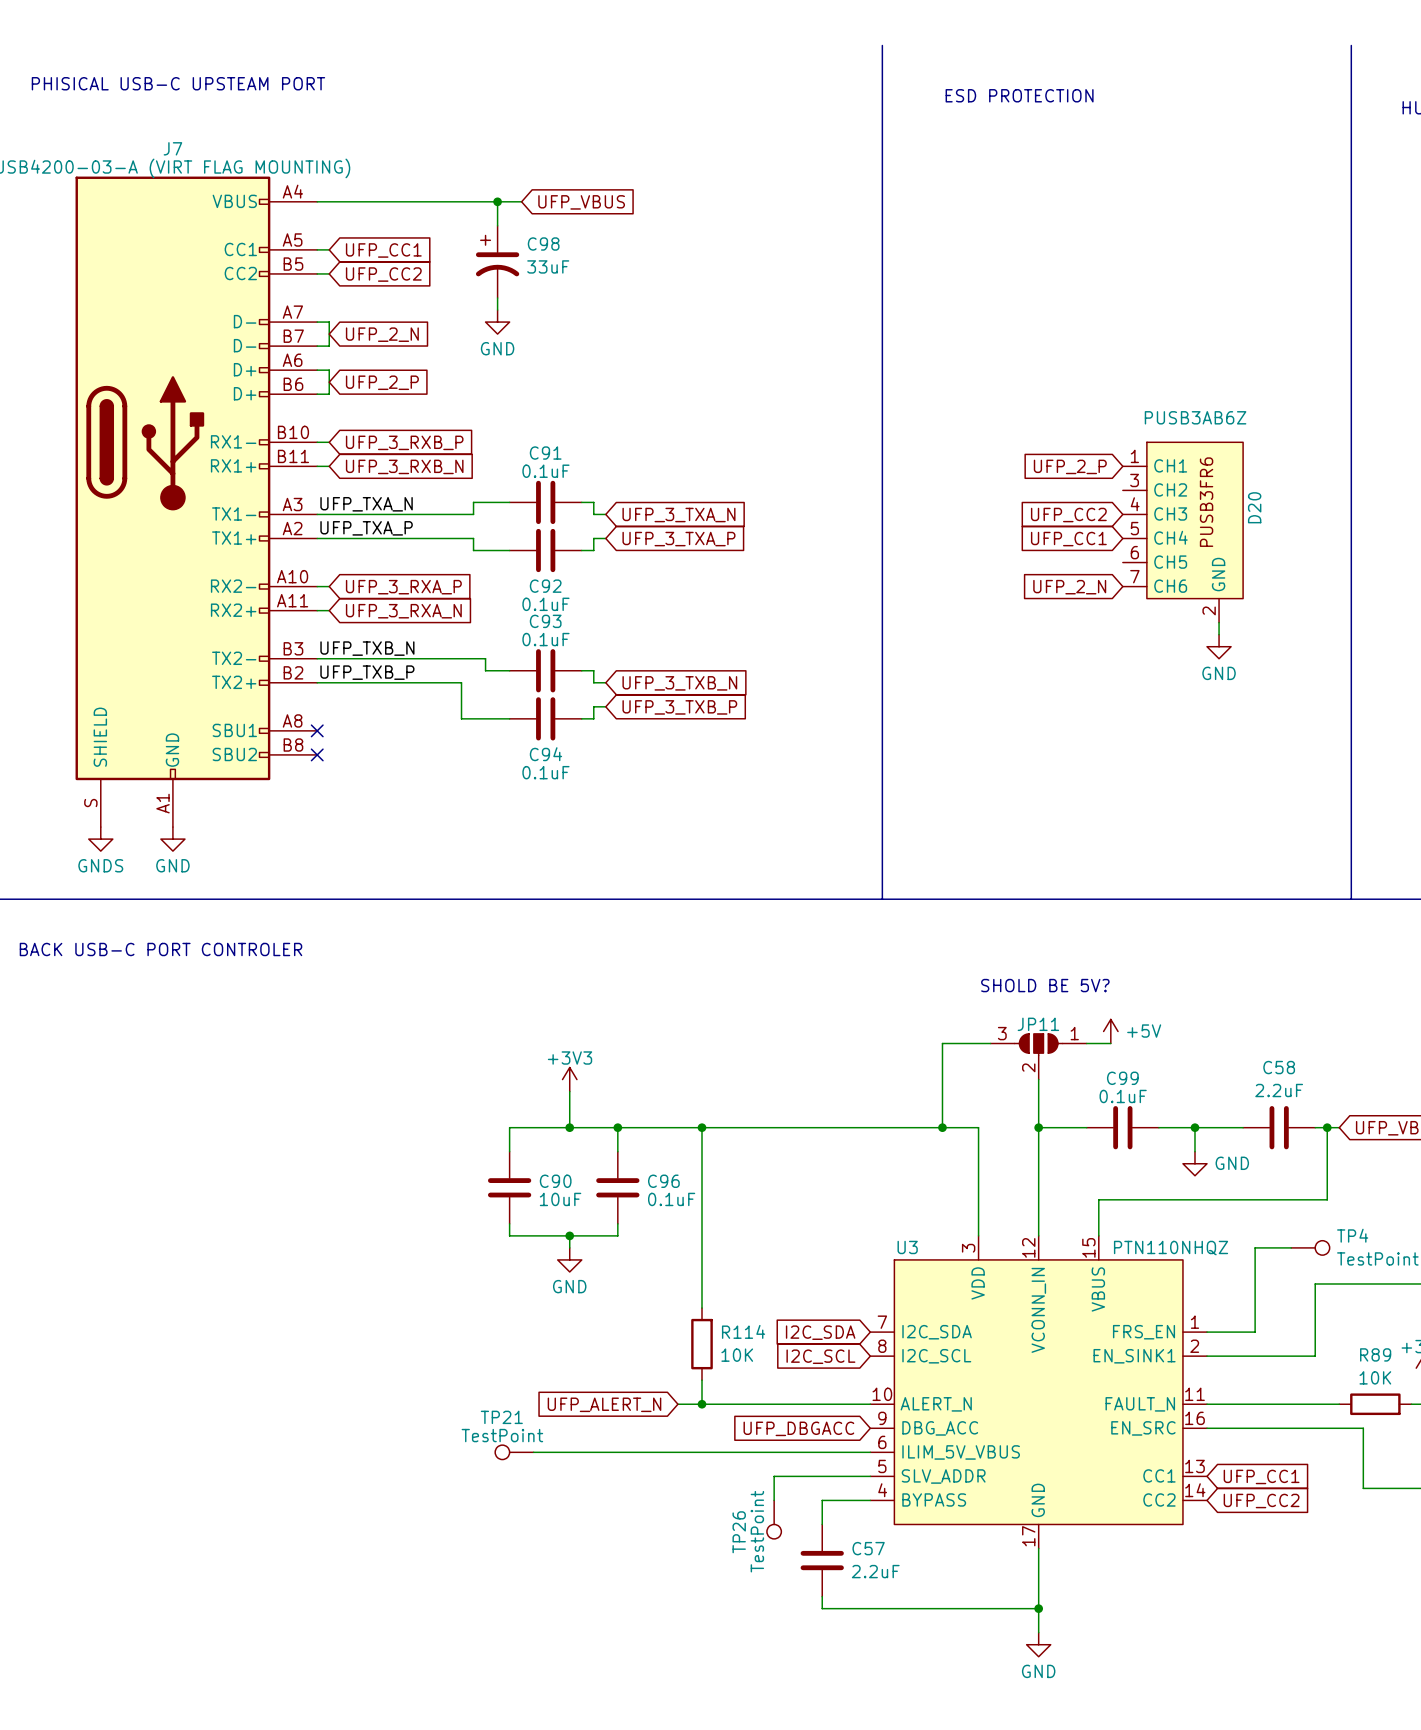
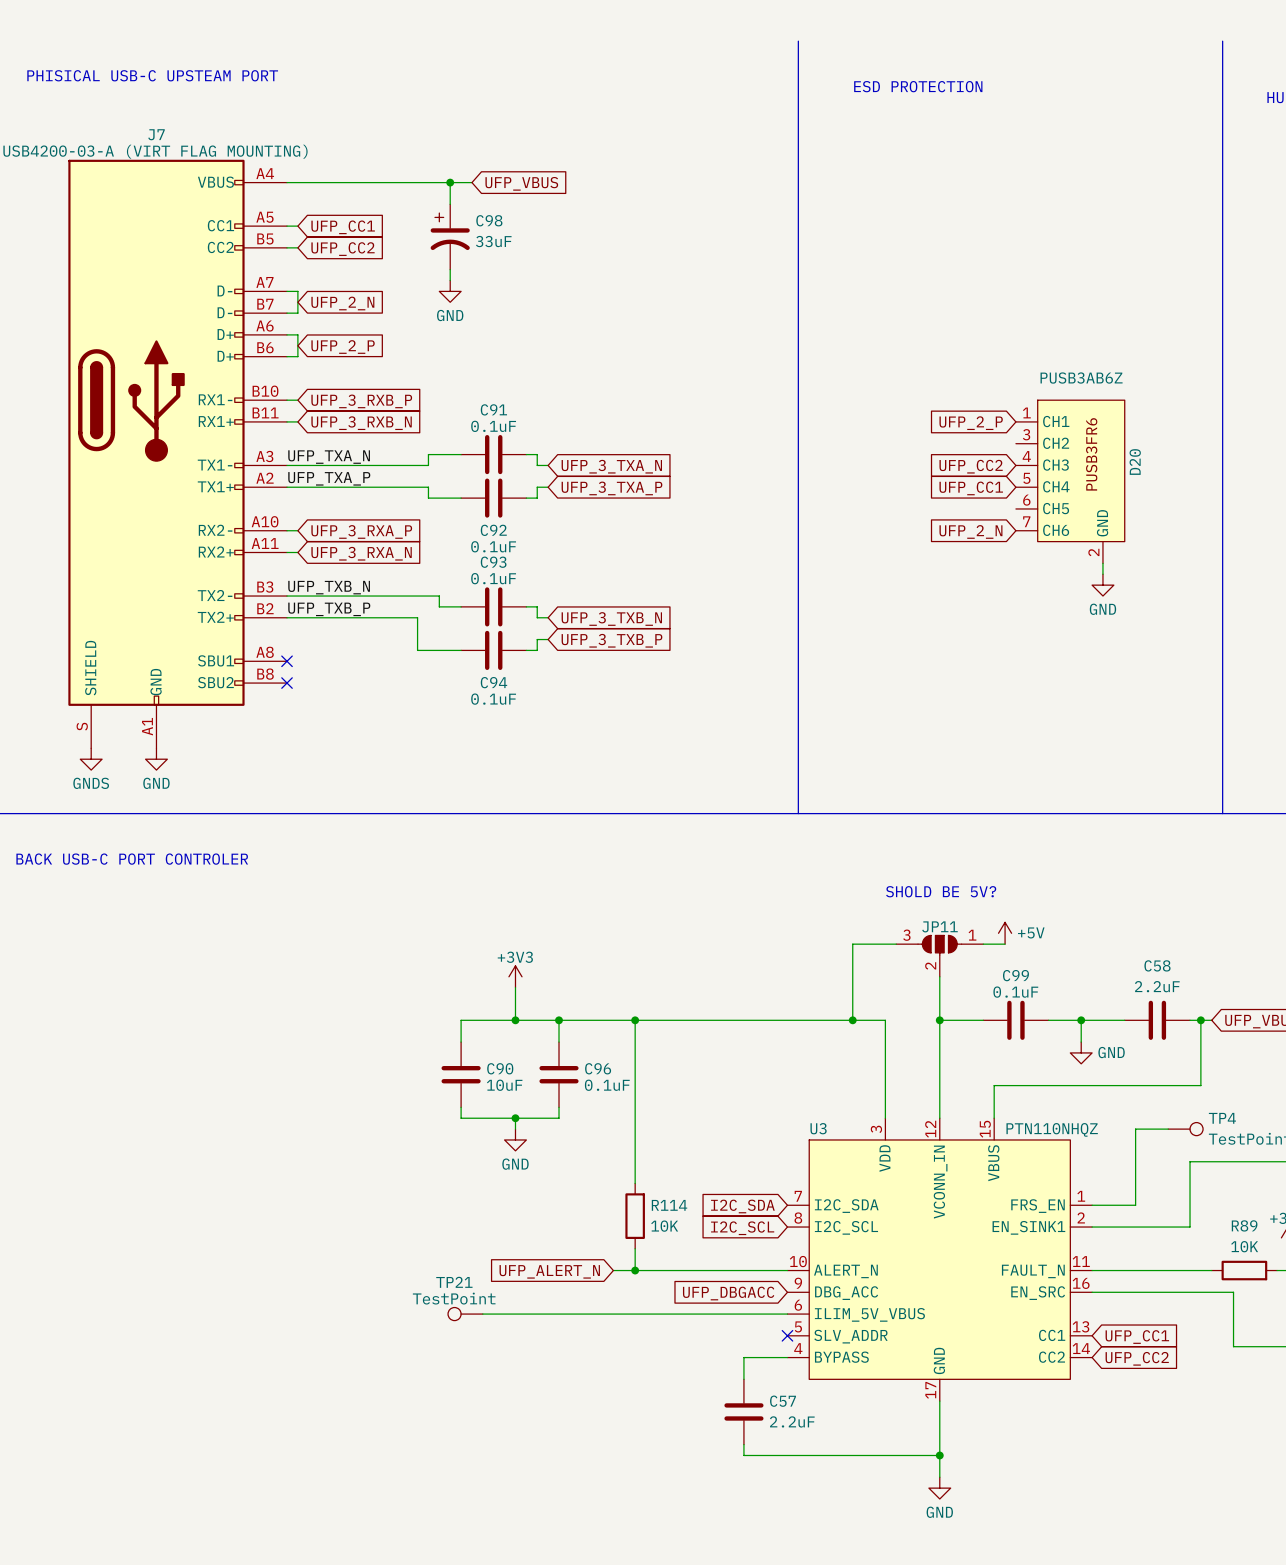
wire: (870, 1476) (774, 1476) (774, 1500) -> none
no-connect mark: none -> (787, 1335)
TP26: TestPoint (774, 1519) -> none

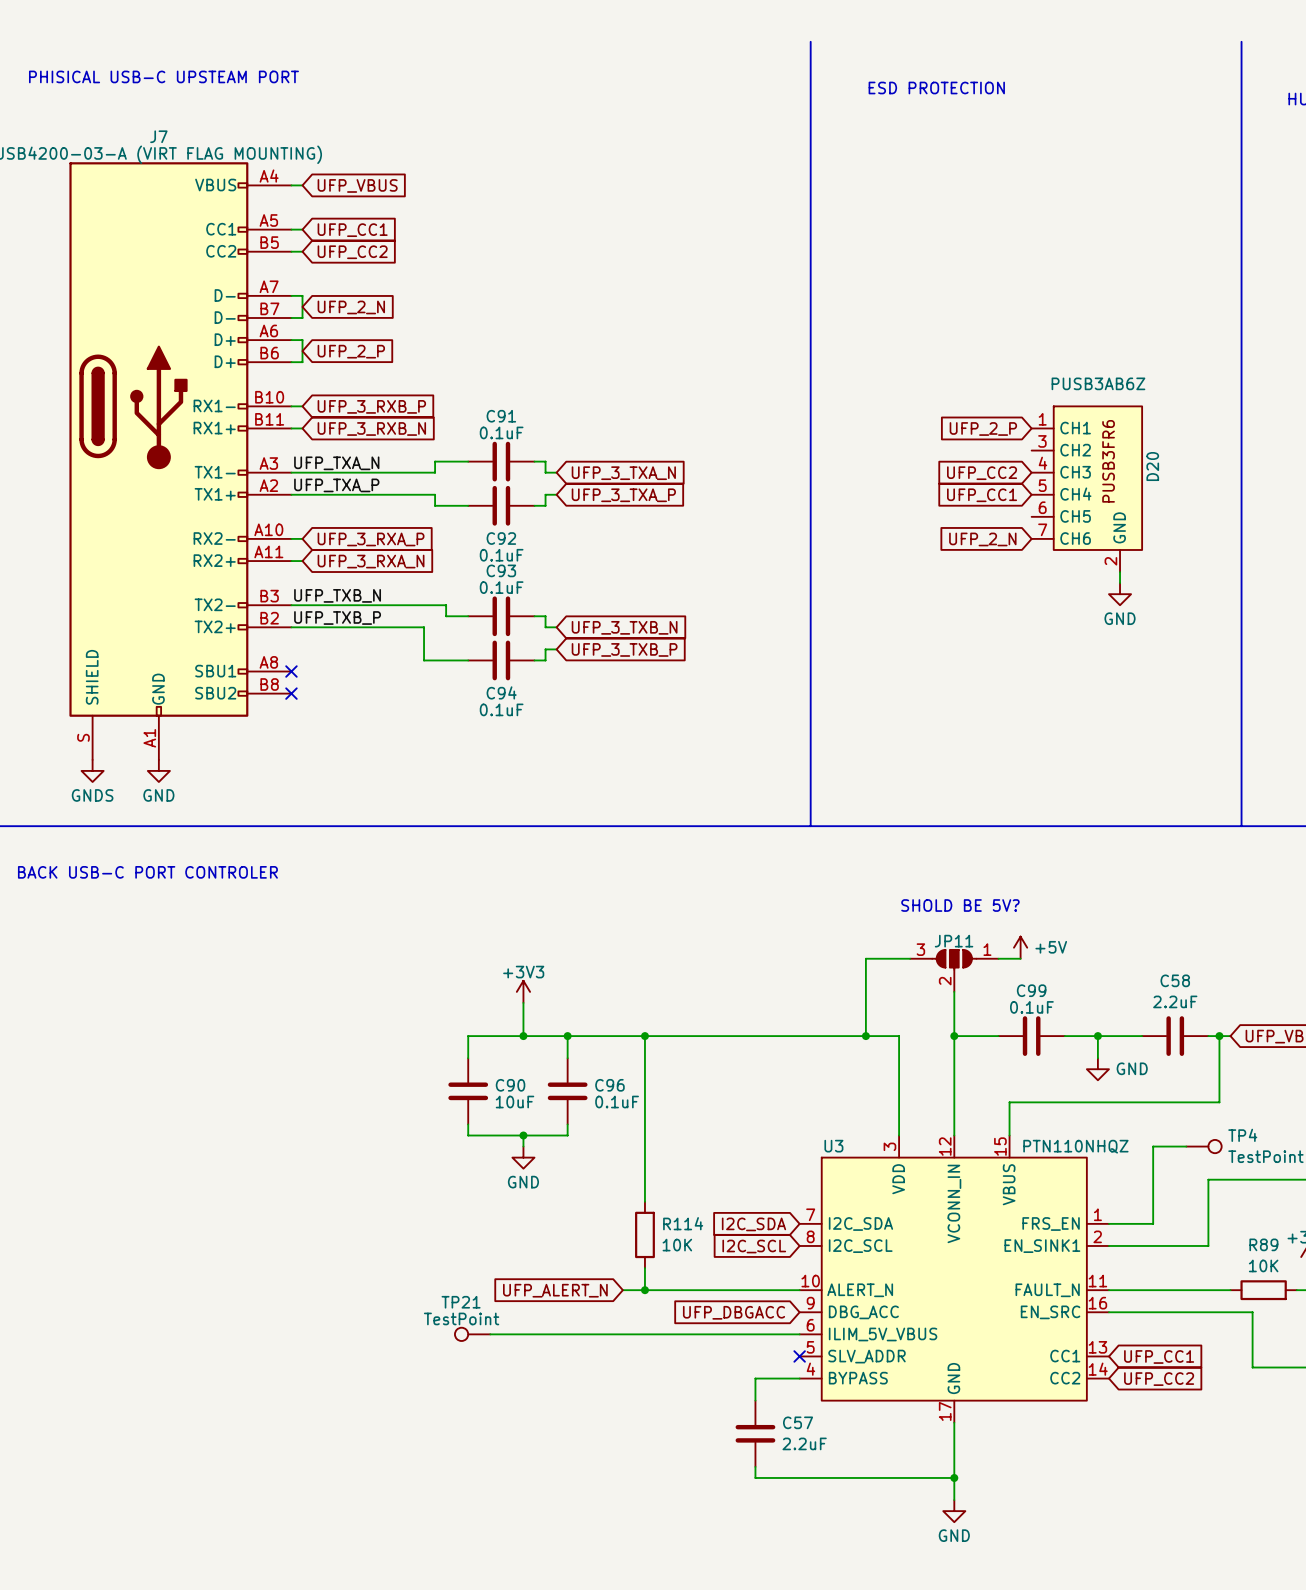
wire: (297, 182) (471, 182) -> none
wire: (450, 182) (450, 204) -> none
junction: (450, 182) -> none
global label position: UFP_VBUS (521, 183) -> UFP_VBUS (357, 185)
C98: 33uF (450, 236) -> none
wire: (450, 269) (450, 280) -> none
power symbol: GND (450, 291) -> none

